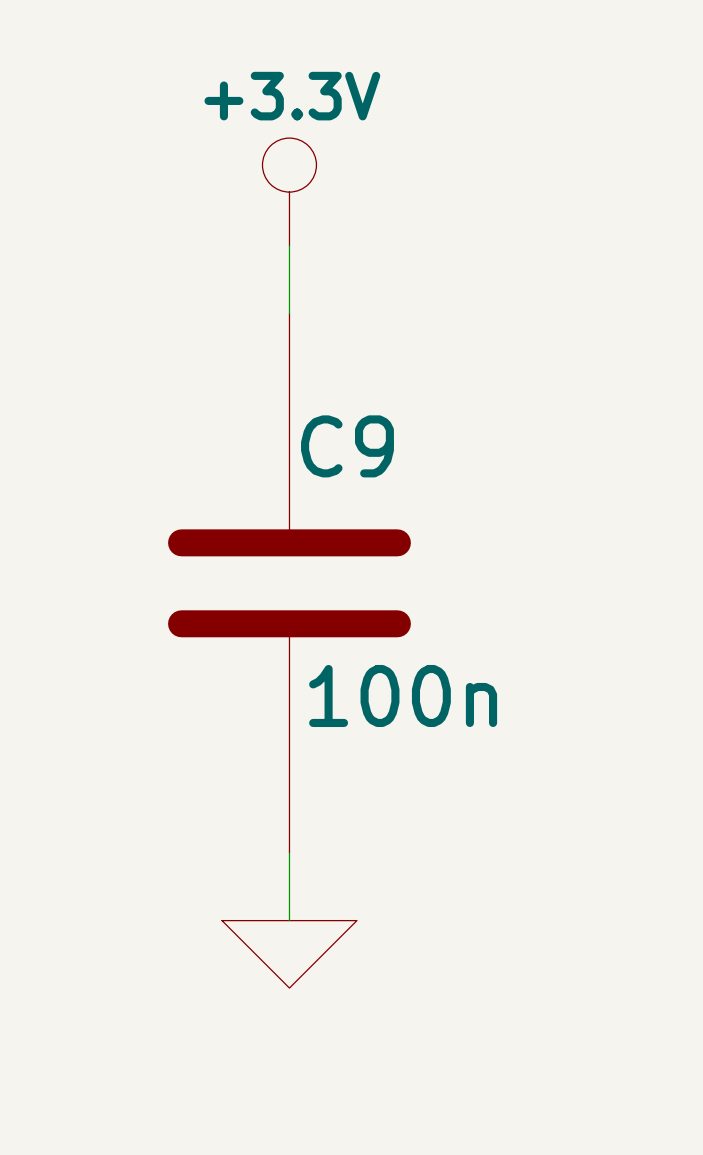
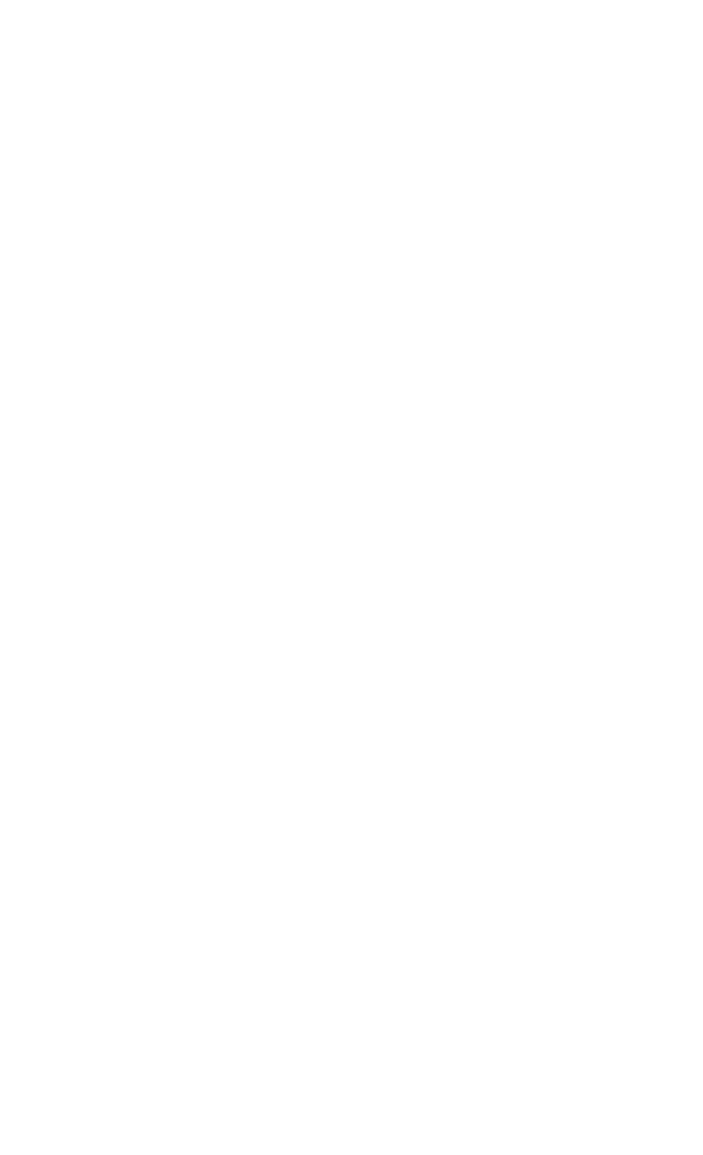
power symbol: +3.3V (289, 192) -> none
wire: (289, 246) (289, 313) -> none
C9: 100n (289, 583) -> none
wire: (289, 853) (289, 920) -> none
power symbol: (289, 954) -> none

